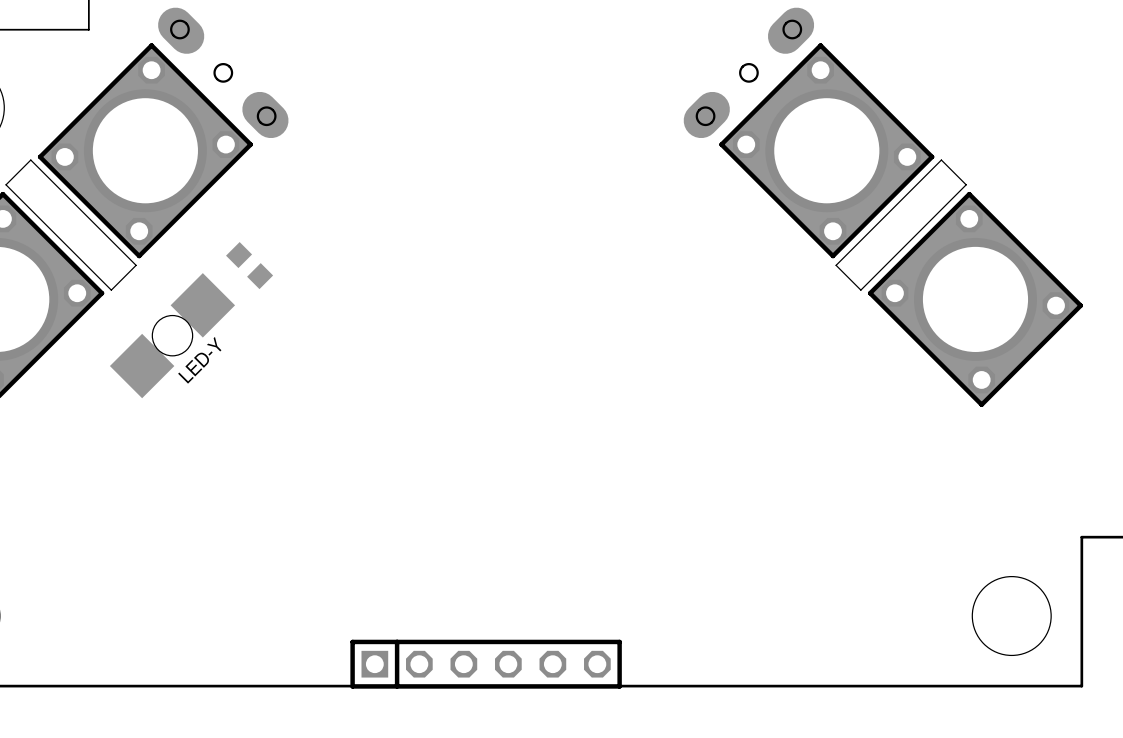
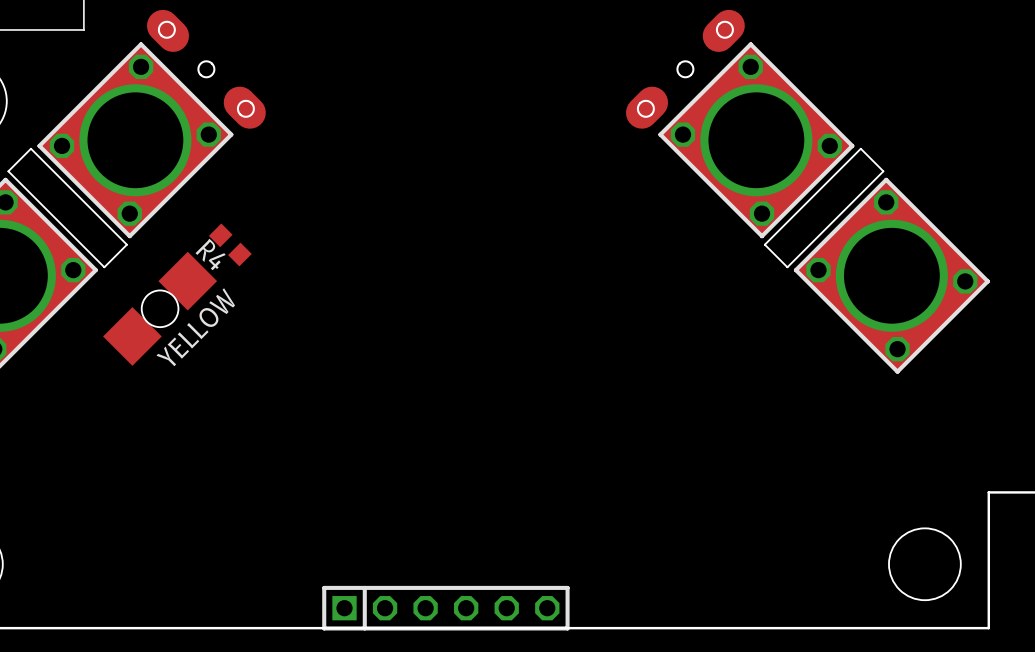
R4 name: none -> R4 (210, 254)
LED-Y name: LED-Y (199, 360) -> YELLOW (195, 327)

